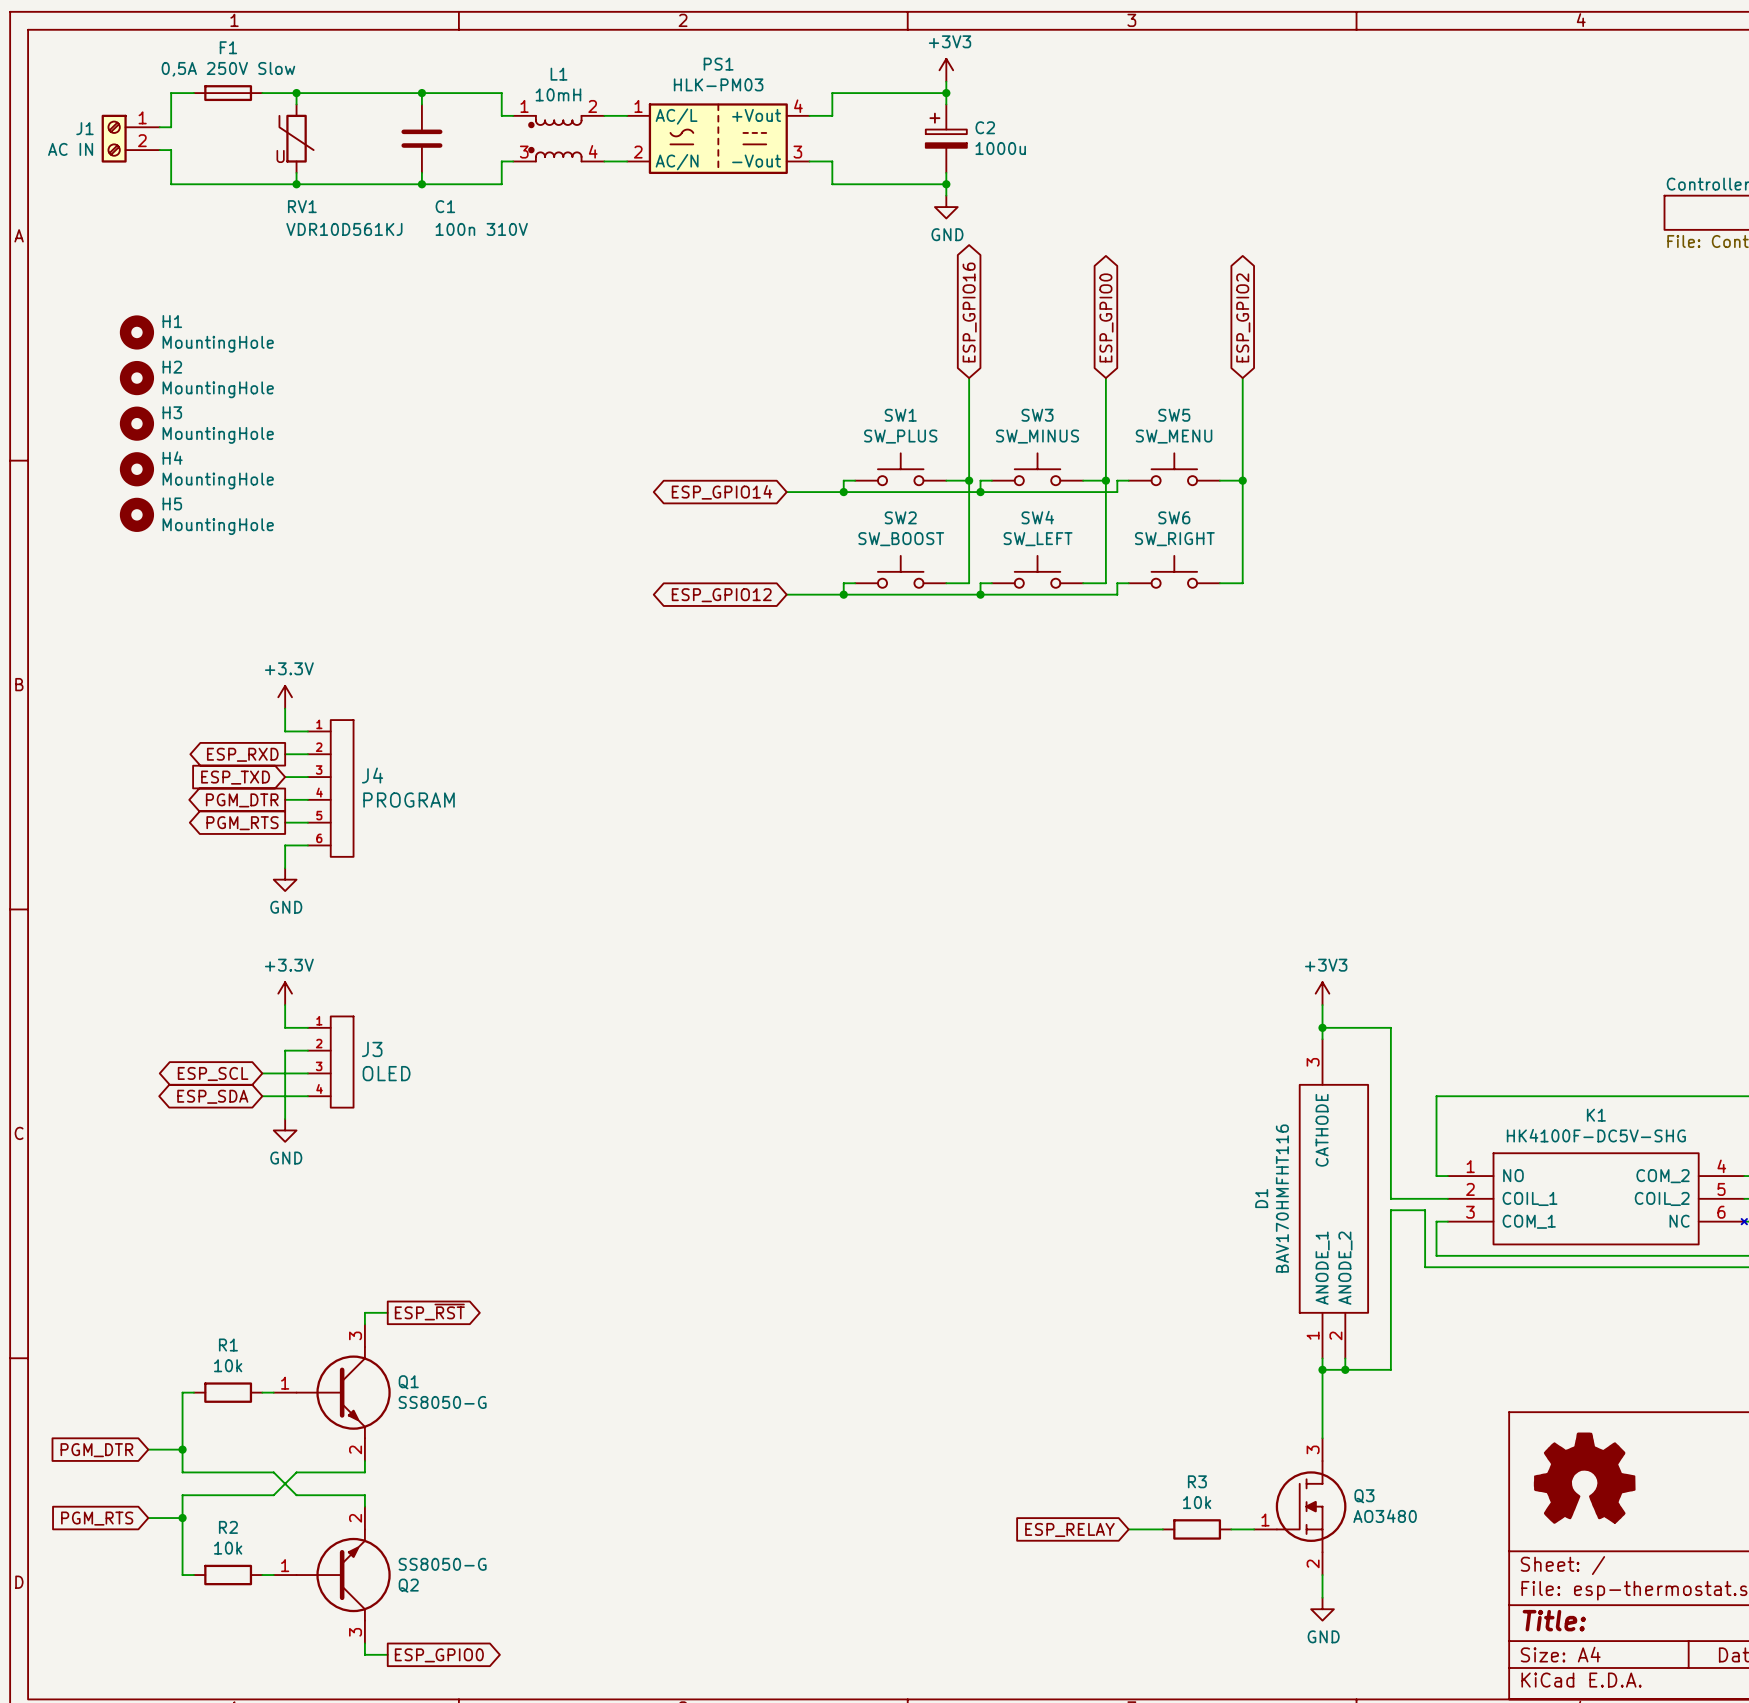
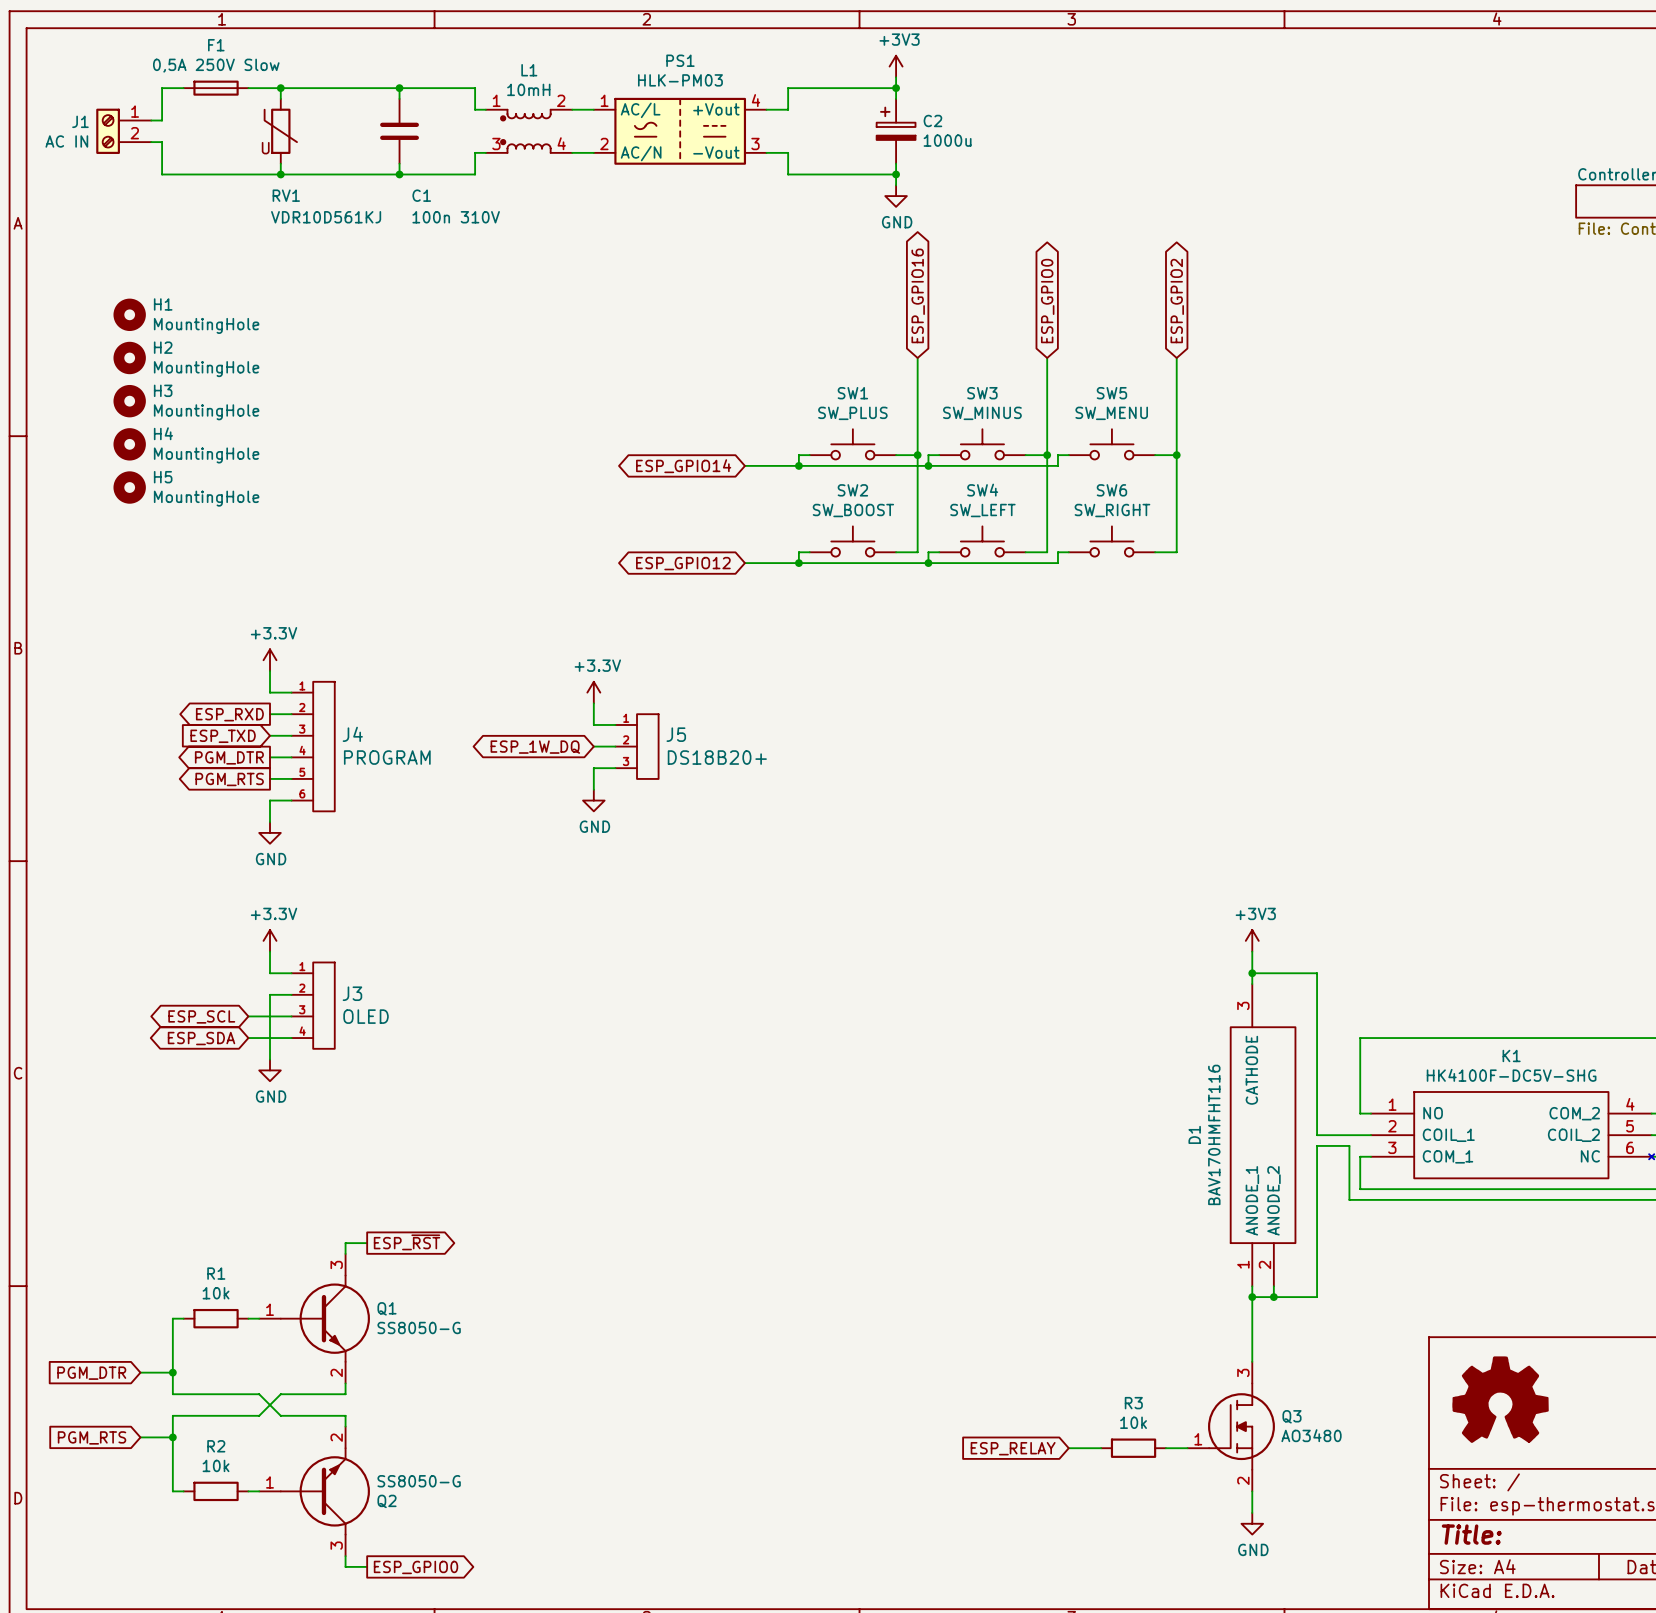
power symbol: none -> +3.3V (593, 692)
wire: none -> (593, 703) (593, 724) (615, 724)
global label: none -> ESP_1W_DQ (535, 747)
wire: none -> (593, 746) (615, 746)
J5: none -> DS18B20+ (637, 746)
wire: none -> (615, 768) (593, 768) (593, 789)
power symbol: none -> GND (593, 800)

